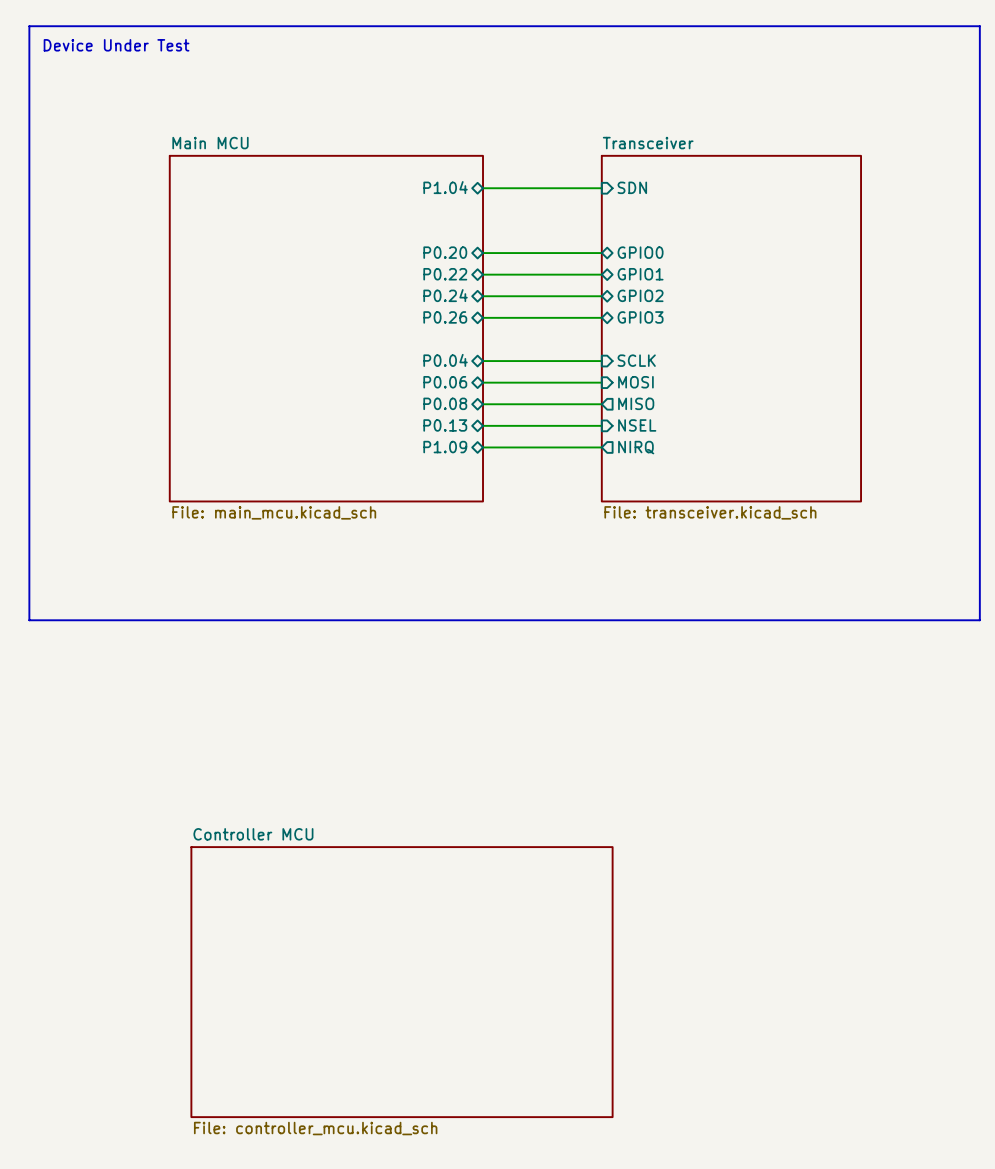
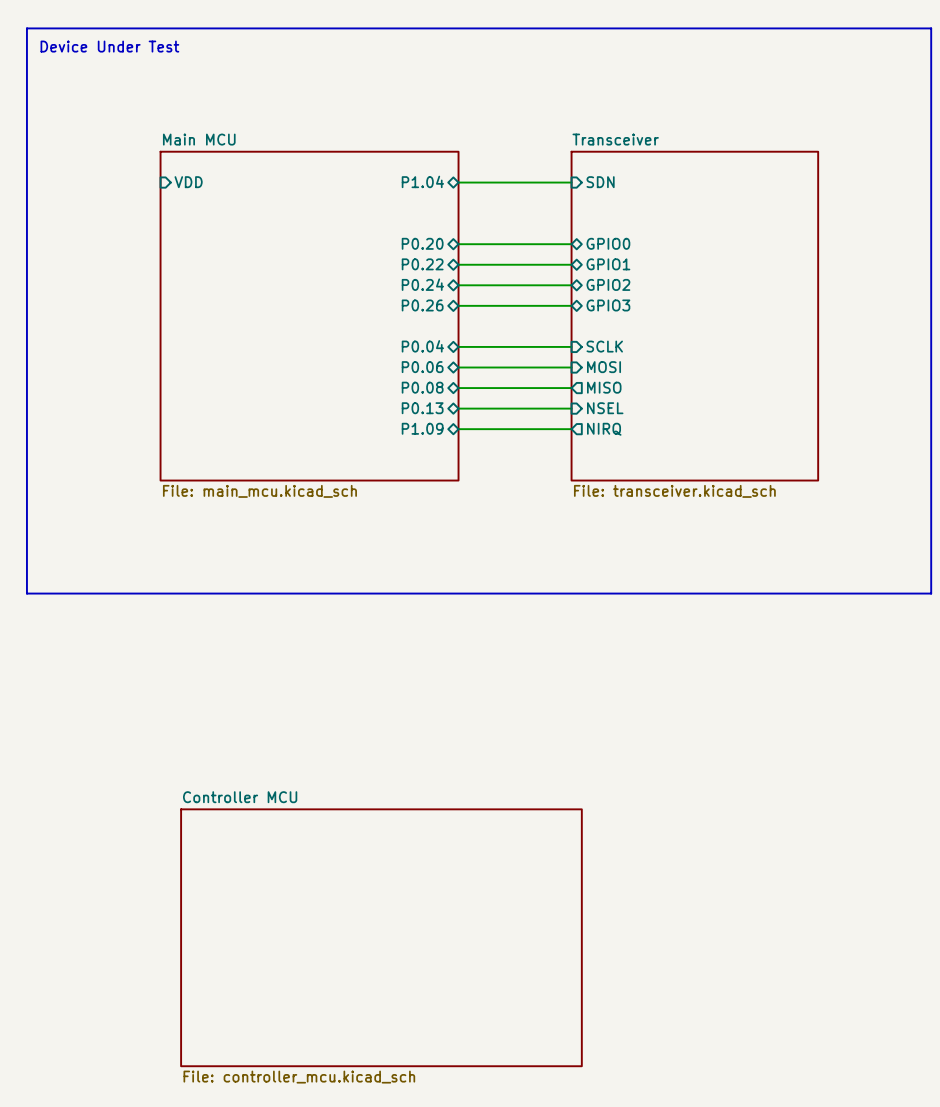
sheet pin: none -> VDD (188, 182)

